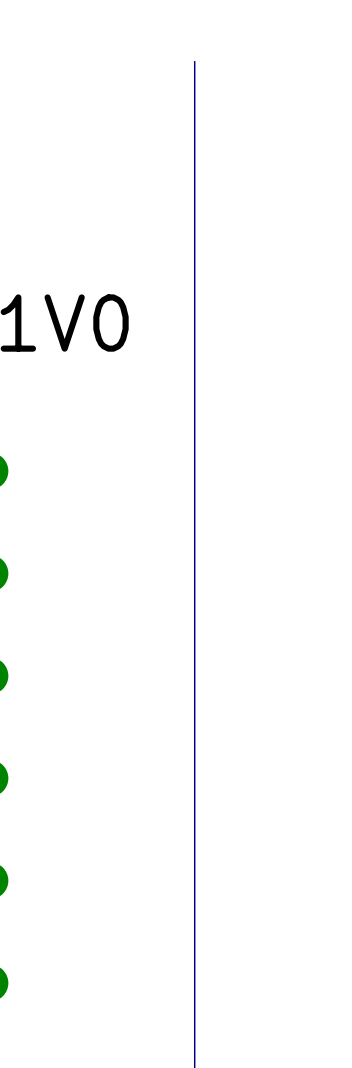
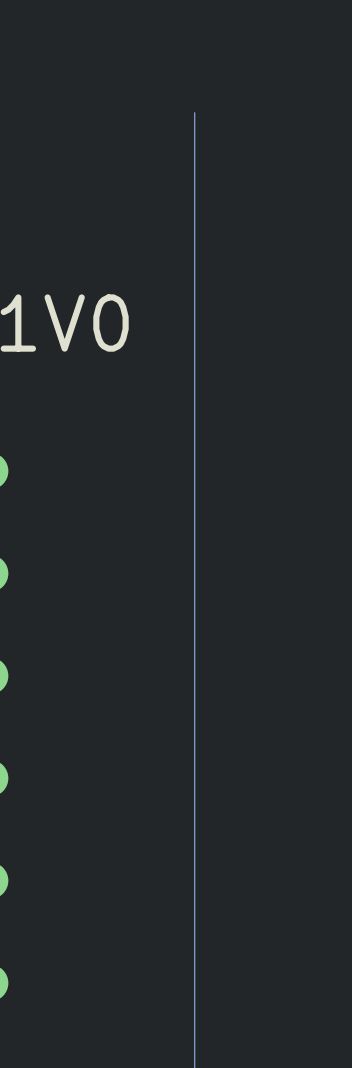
line: (194, 61) (194, 112) -> none

